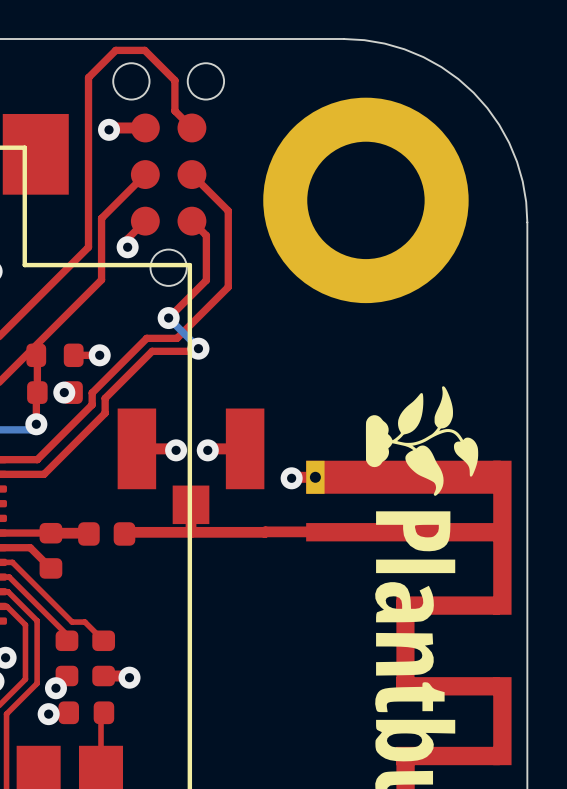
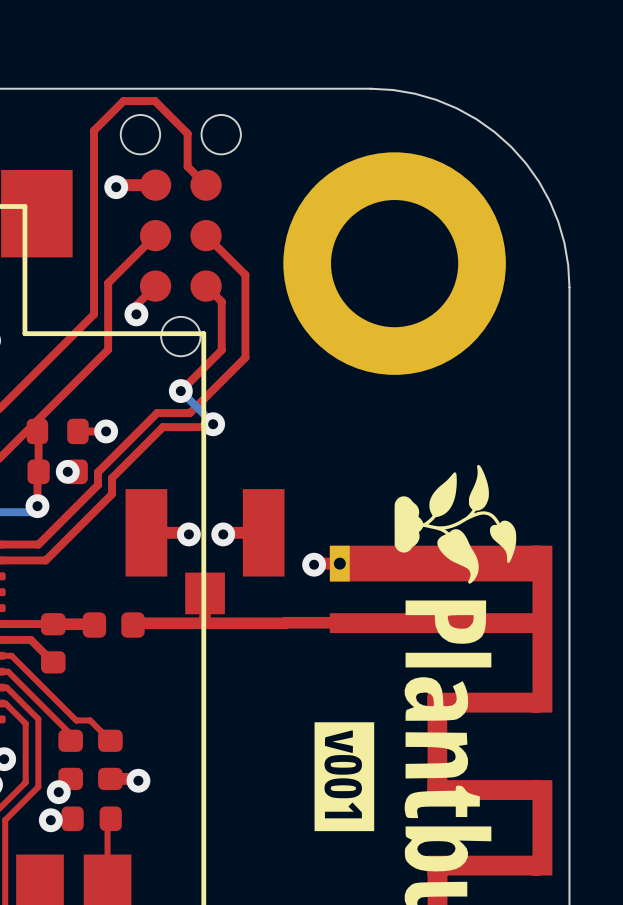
drawing: none -> [314, 722, 375, 832]

